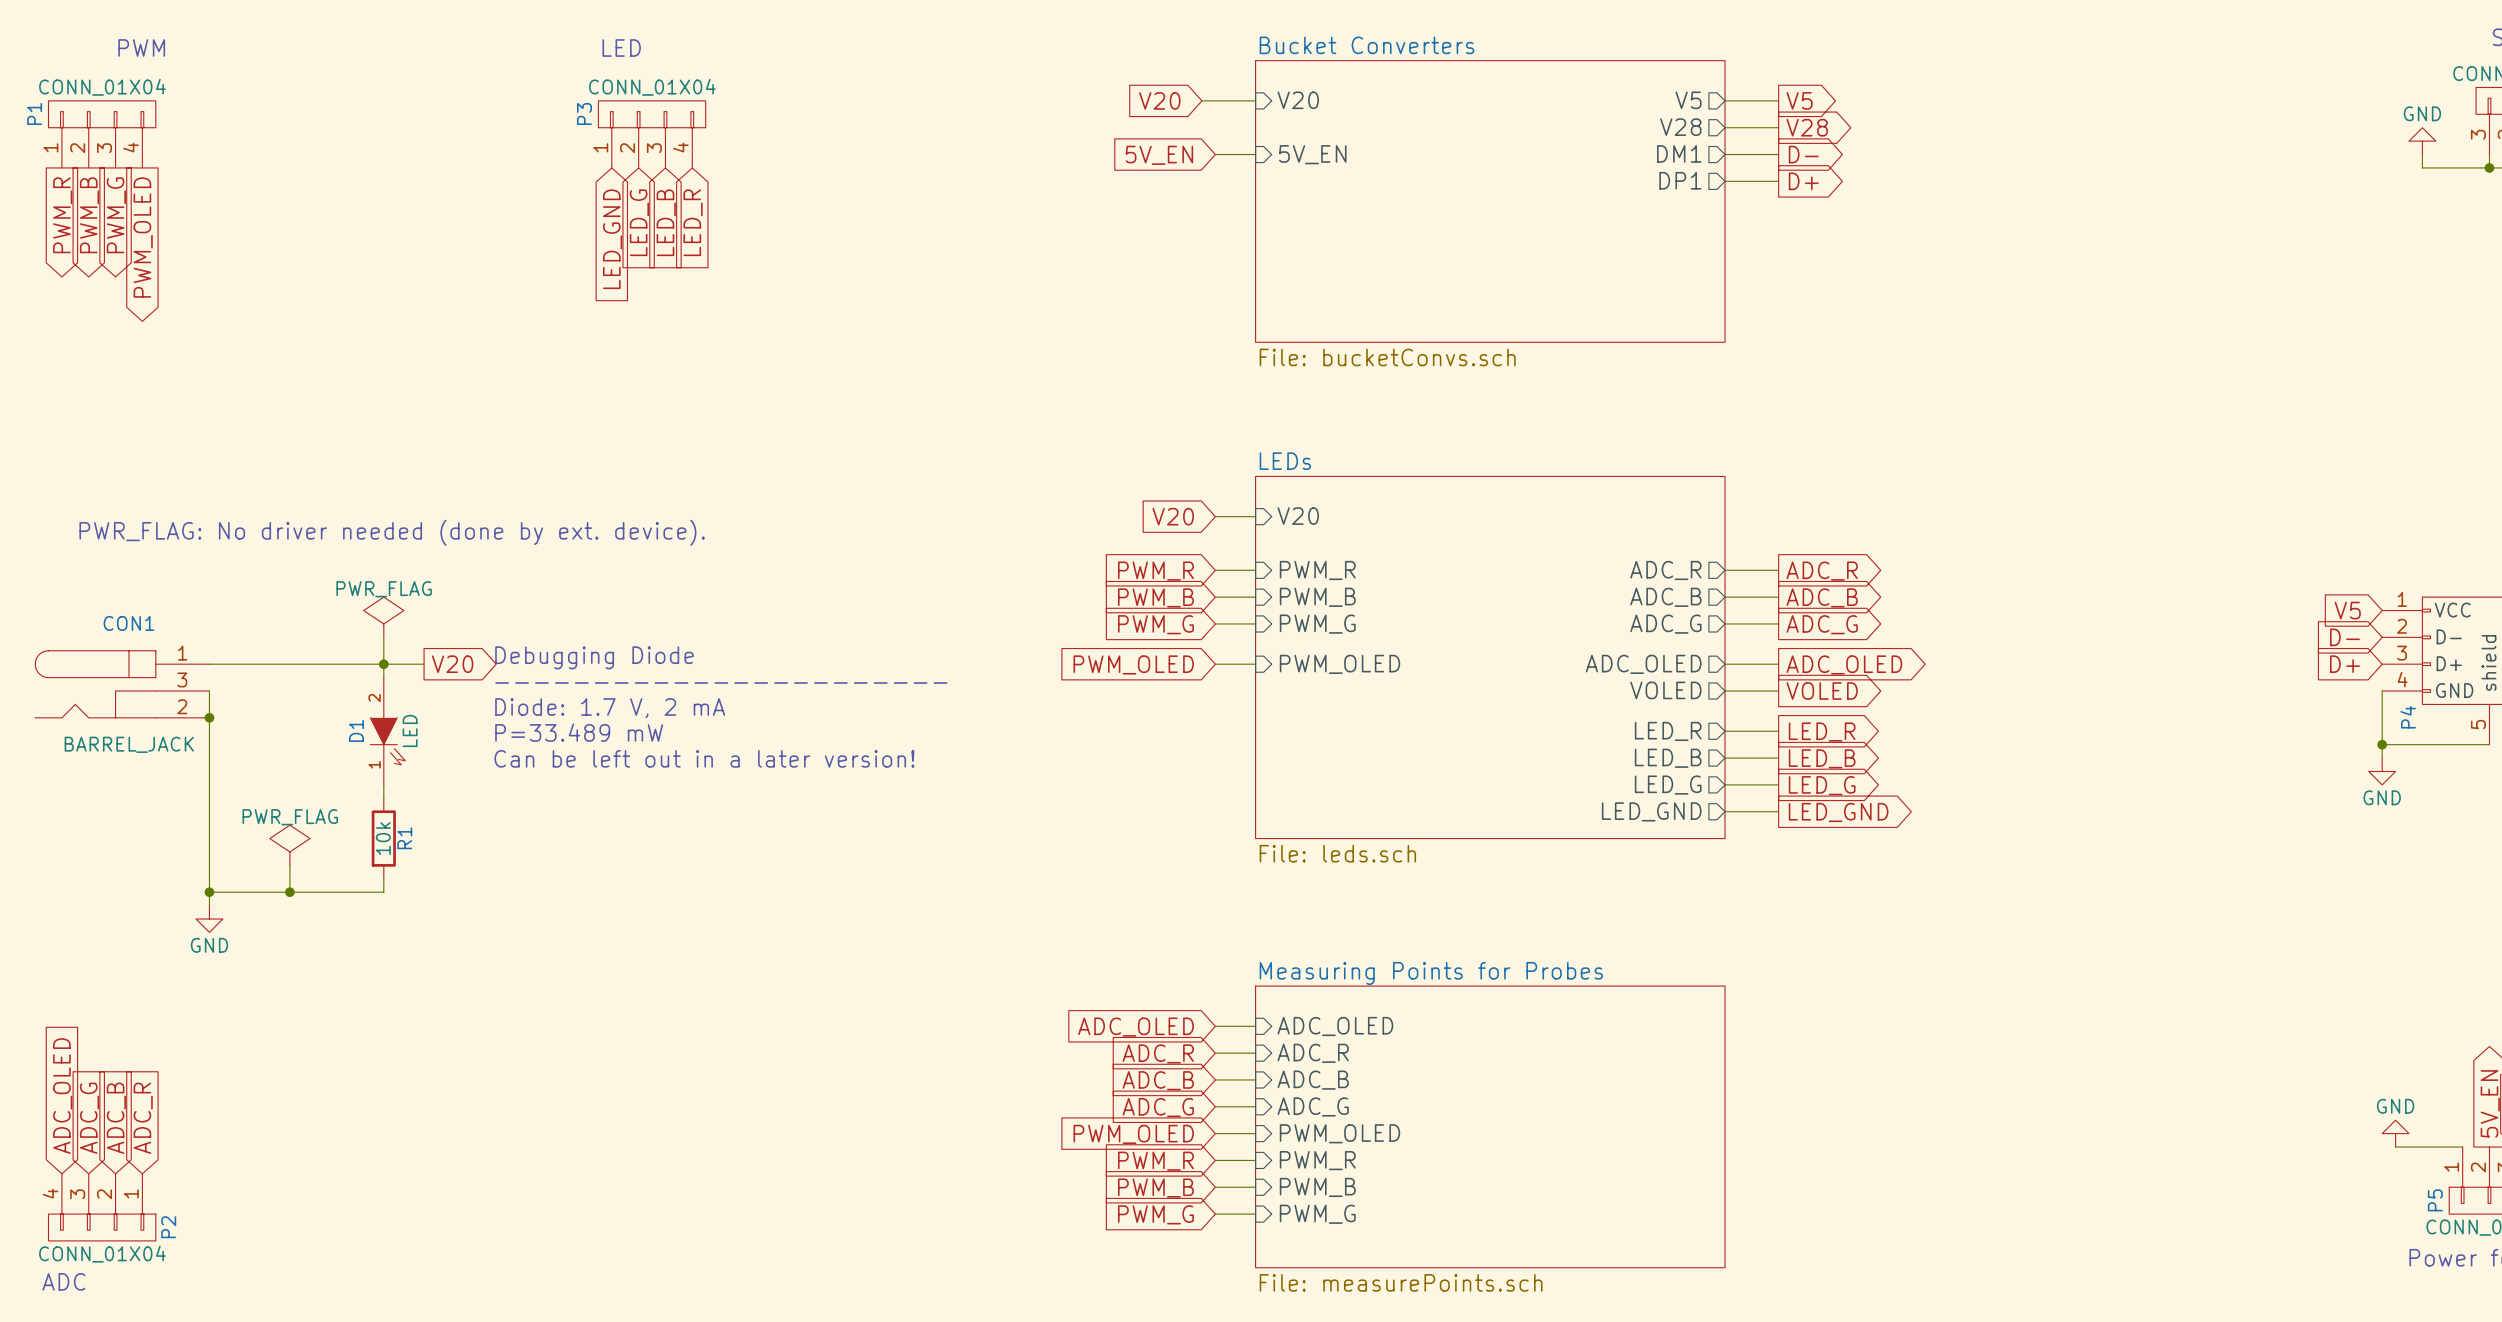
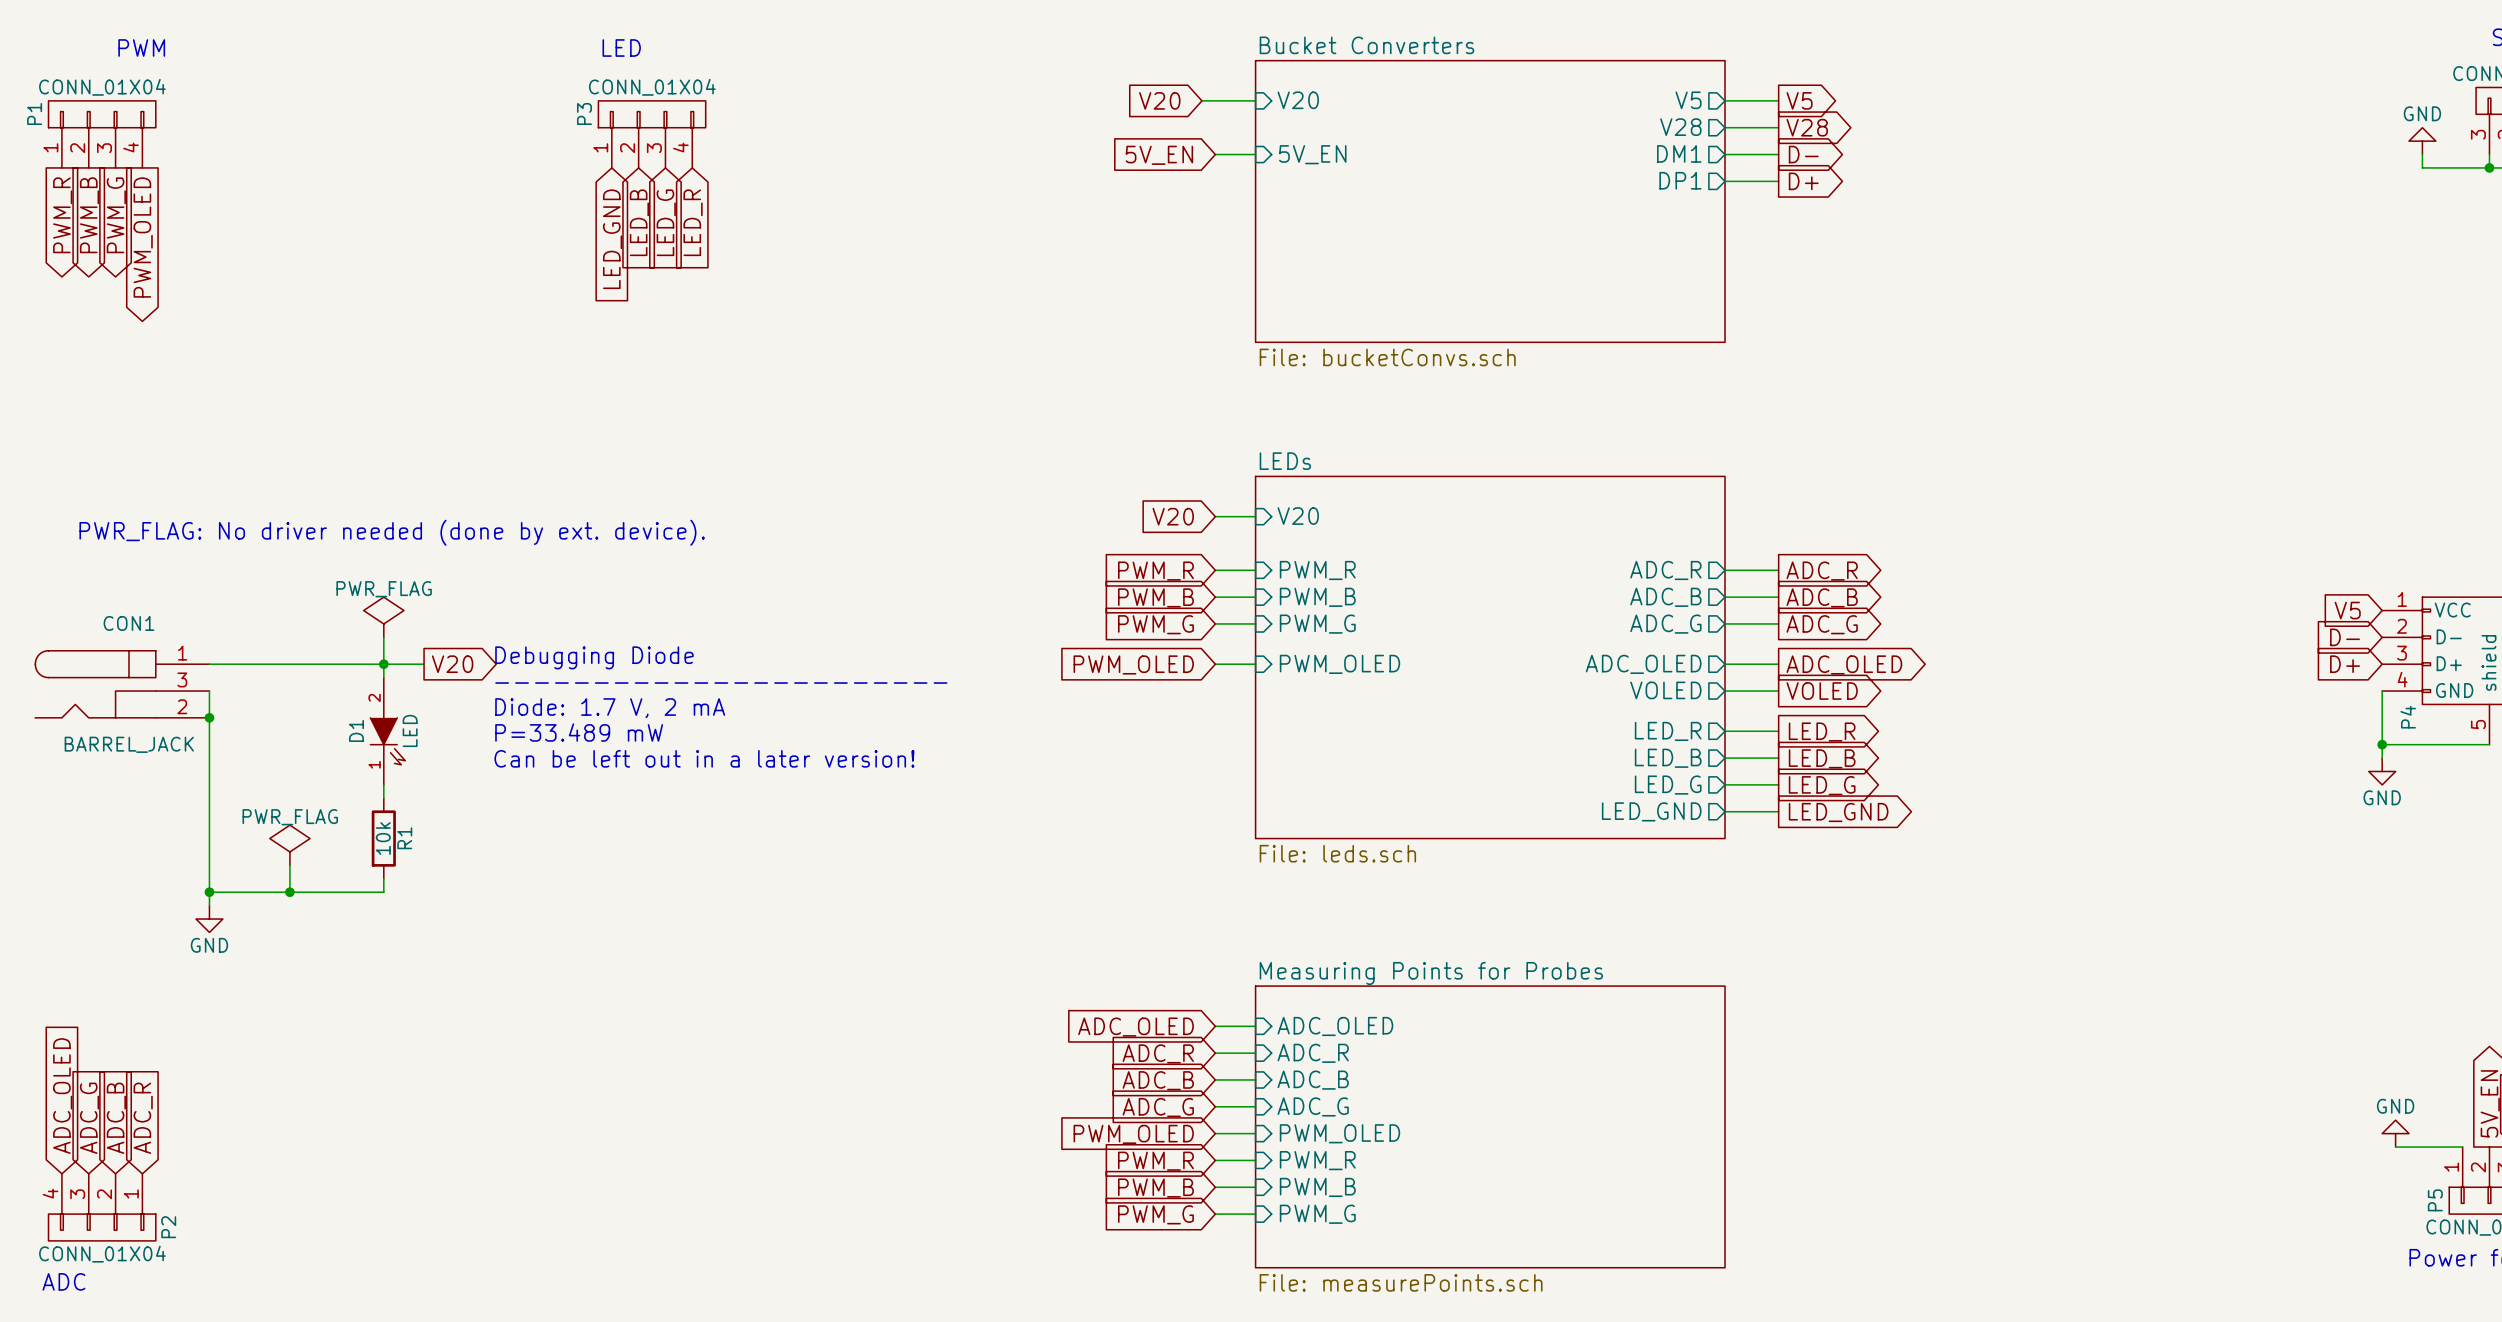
global label: LED_G (639, 222) -> LED_B (639, 222)
global label: LED_B (666, 222) -> LED_G (666, 222)

